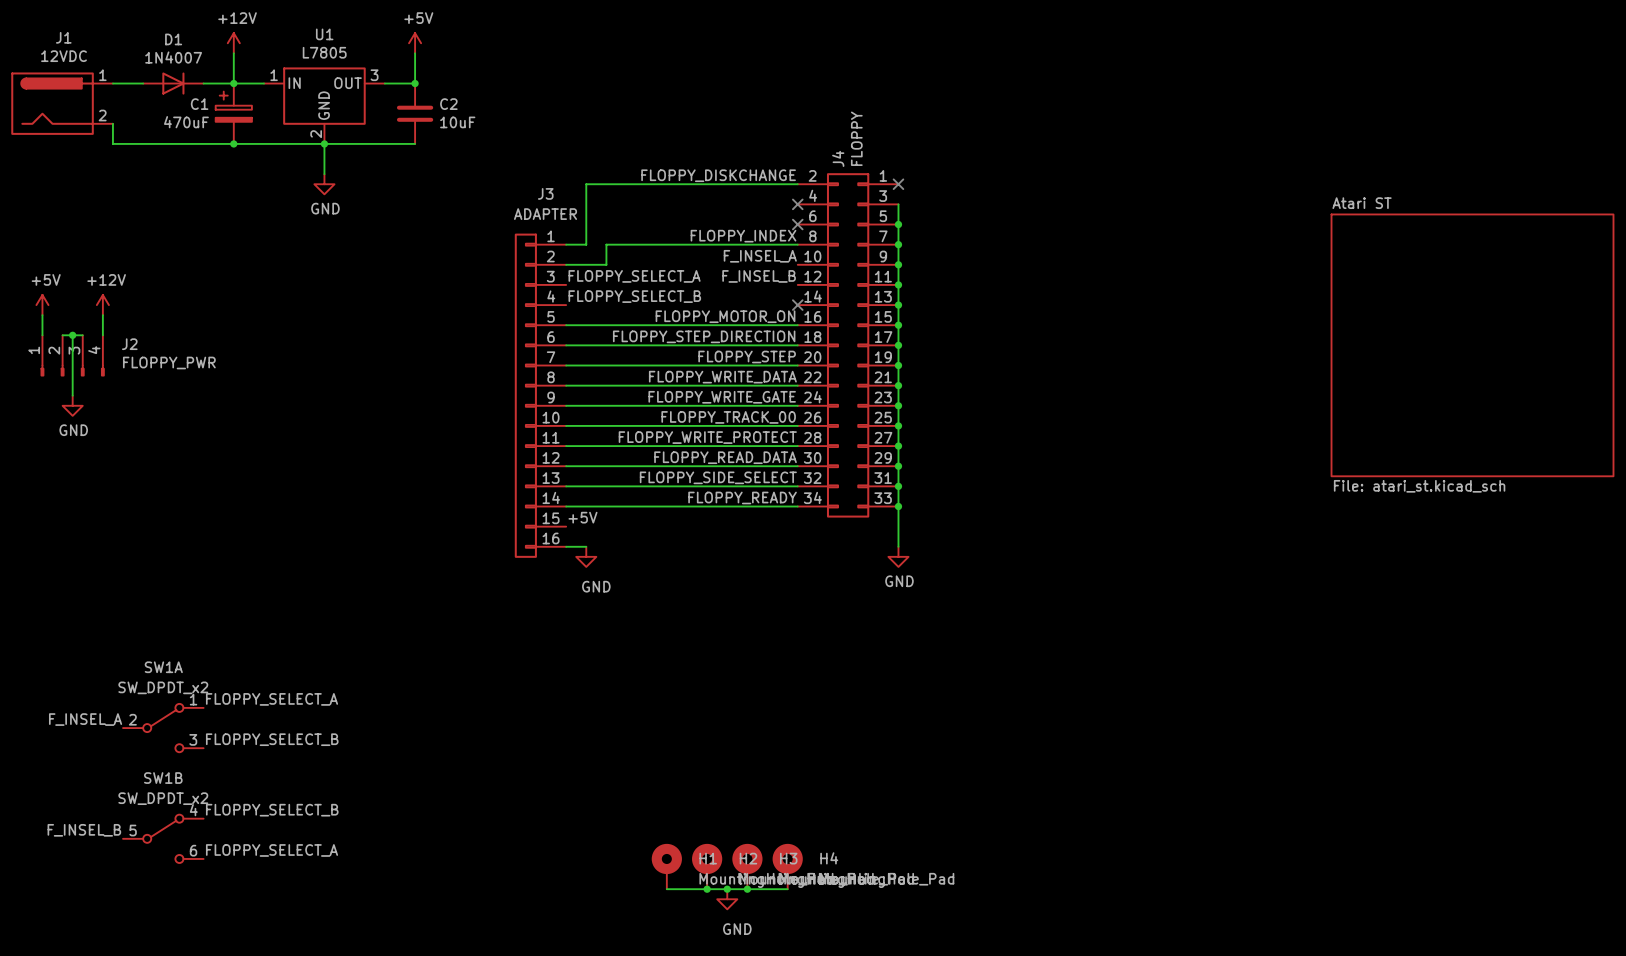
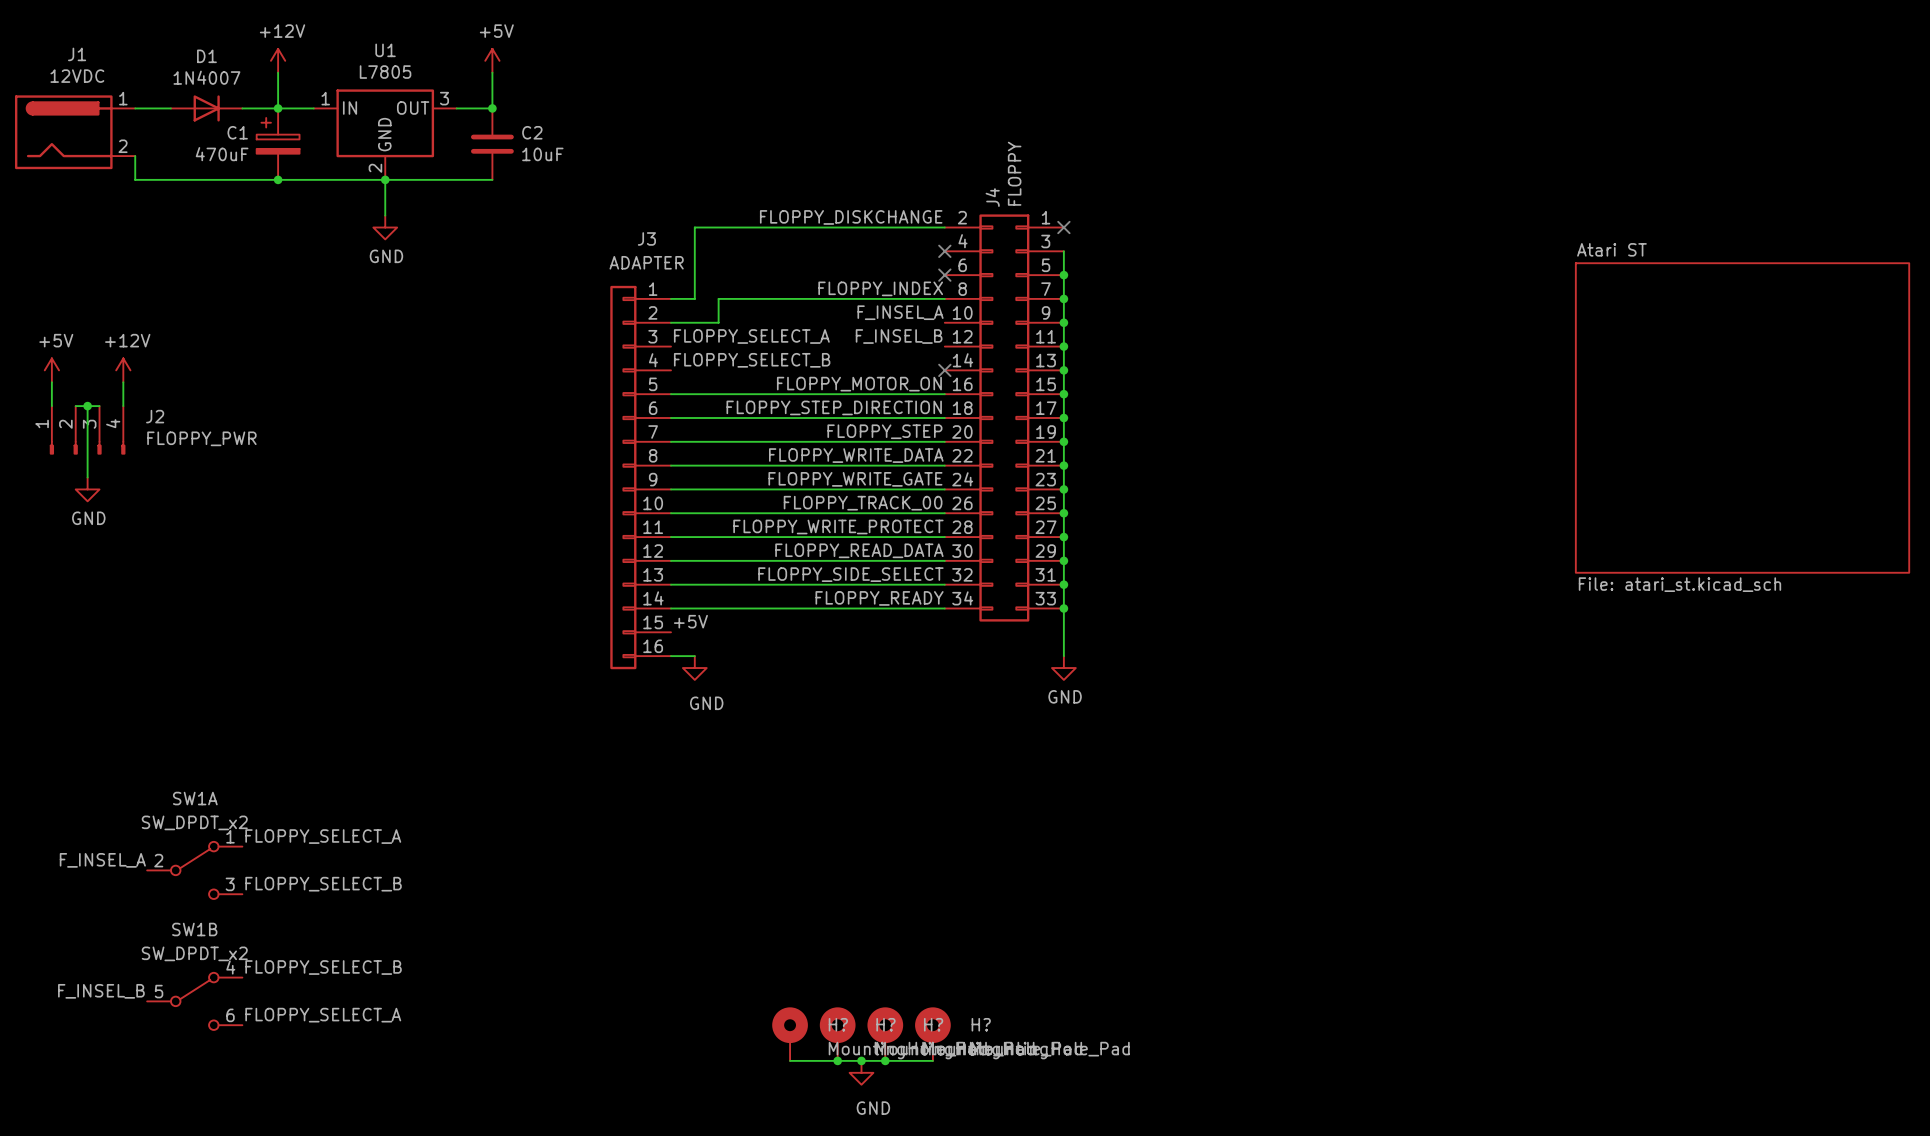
H1 name: H1 (708, 858) -> H? (838, 1024)
H2 name: H2 (748, 858) -> H? (885, 1024)
H3 name: H3 (788, 858) -> H? (933, 1024)
H4 name: H4 (829, 858) -> H? (981, 1024)

